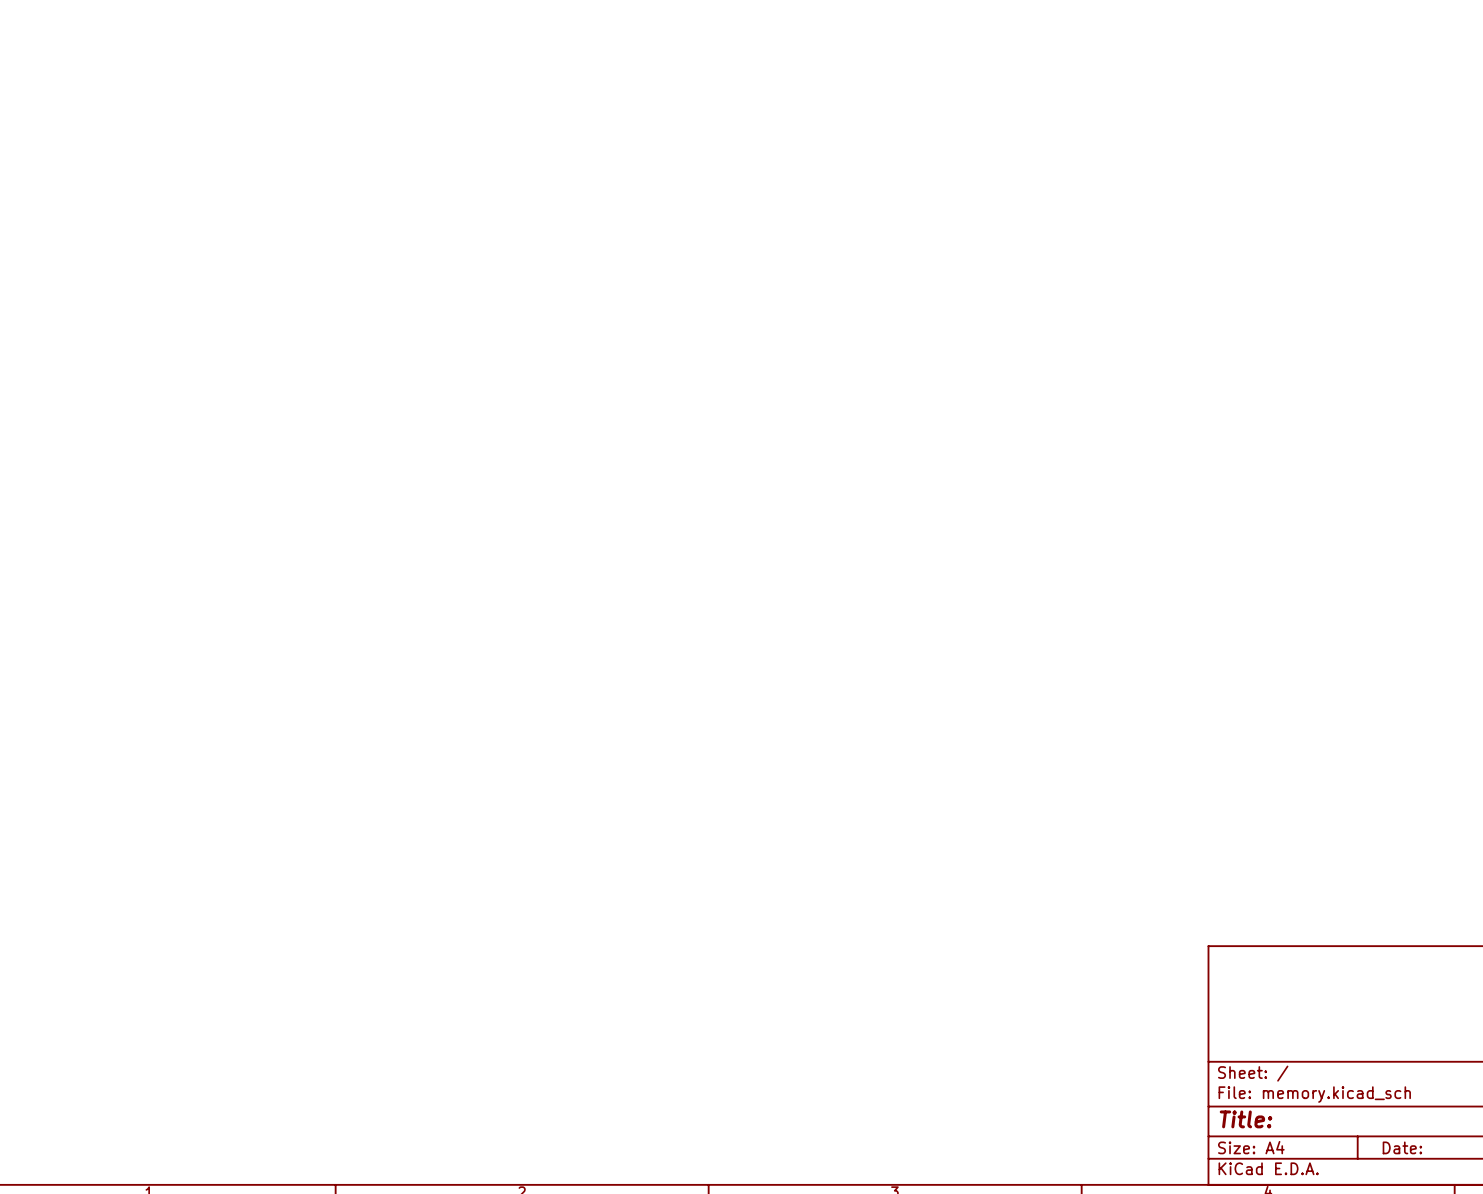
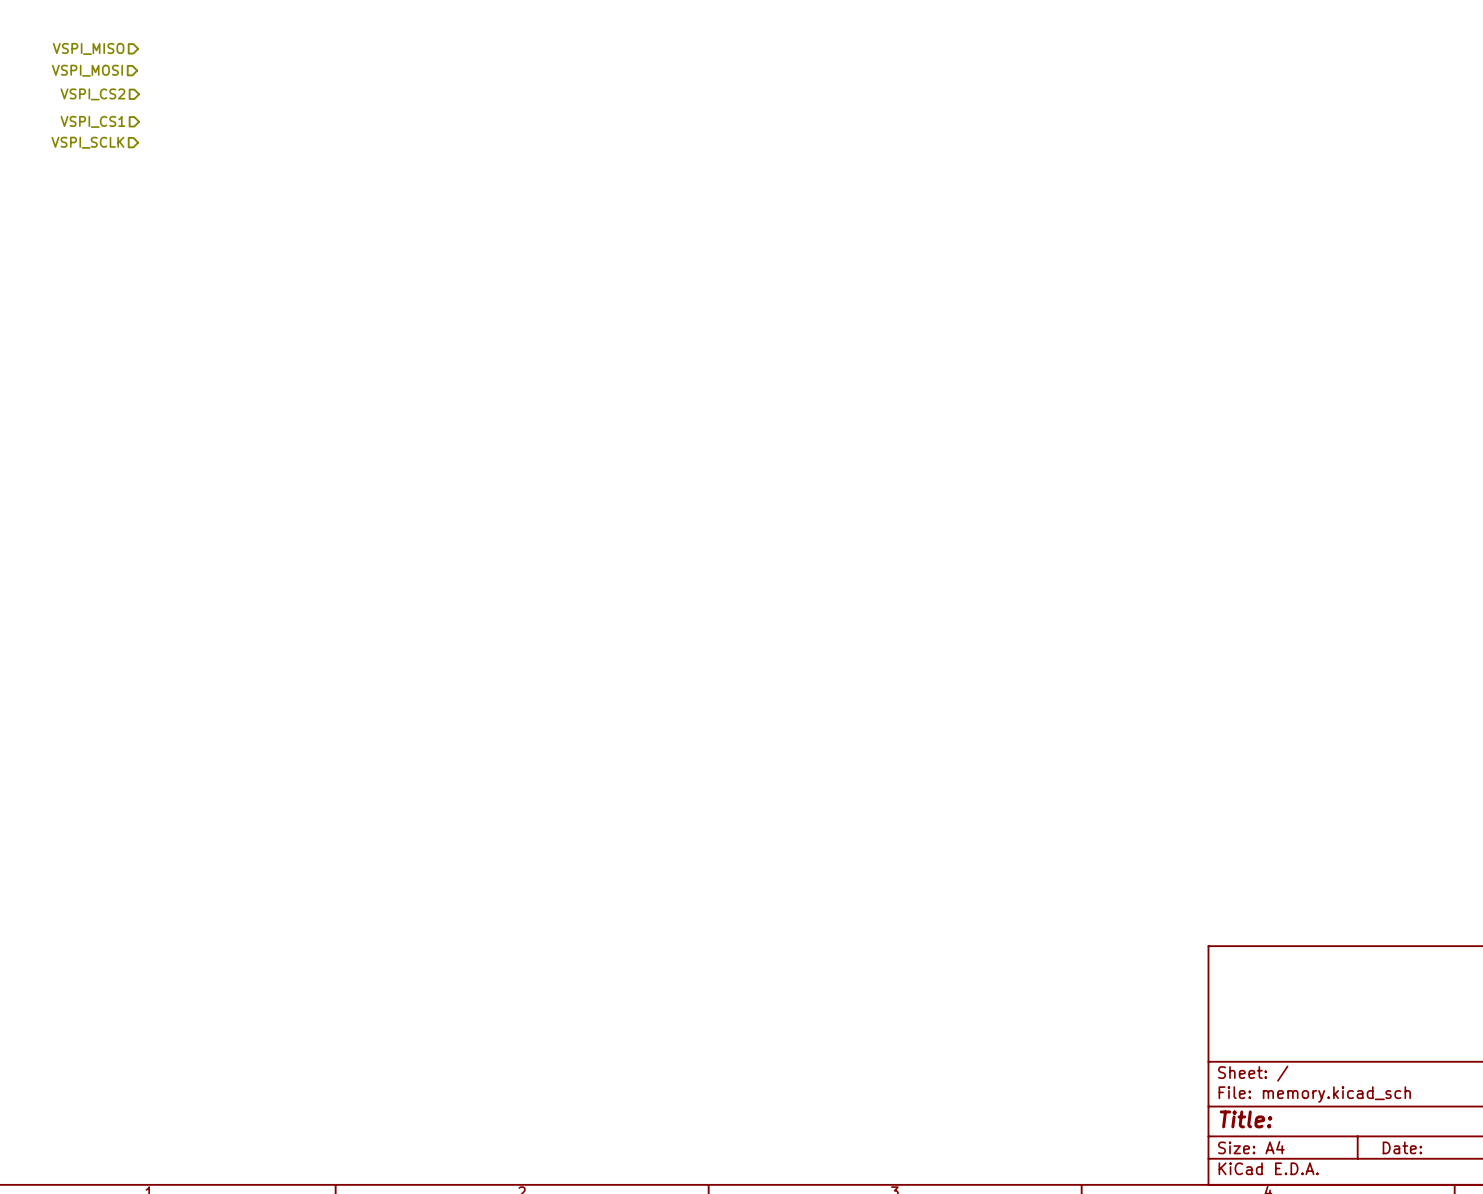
hierarchical label: none -> VSPI_MISO (88, 48)
hierarchical label: none -> VSPI_MOSI (87, 70)
hierarchical label: none -> VSPI_CS2 (92, 94)
hierarchical label: none -> VSPI_CS1 (92, 121)
hierarchical label: none -> VSPI_SCLK (87, 142)

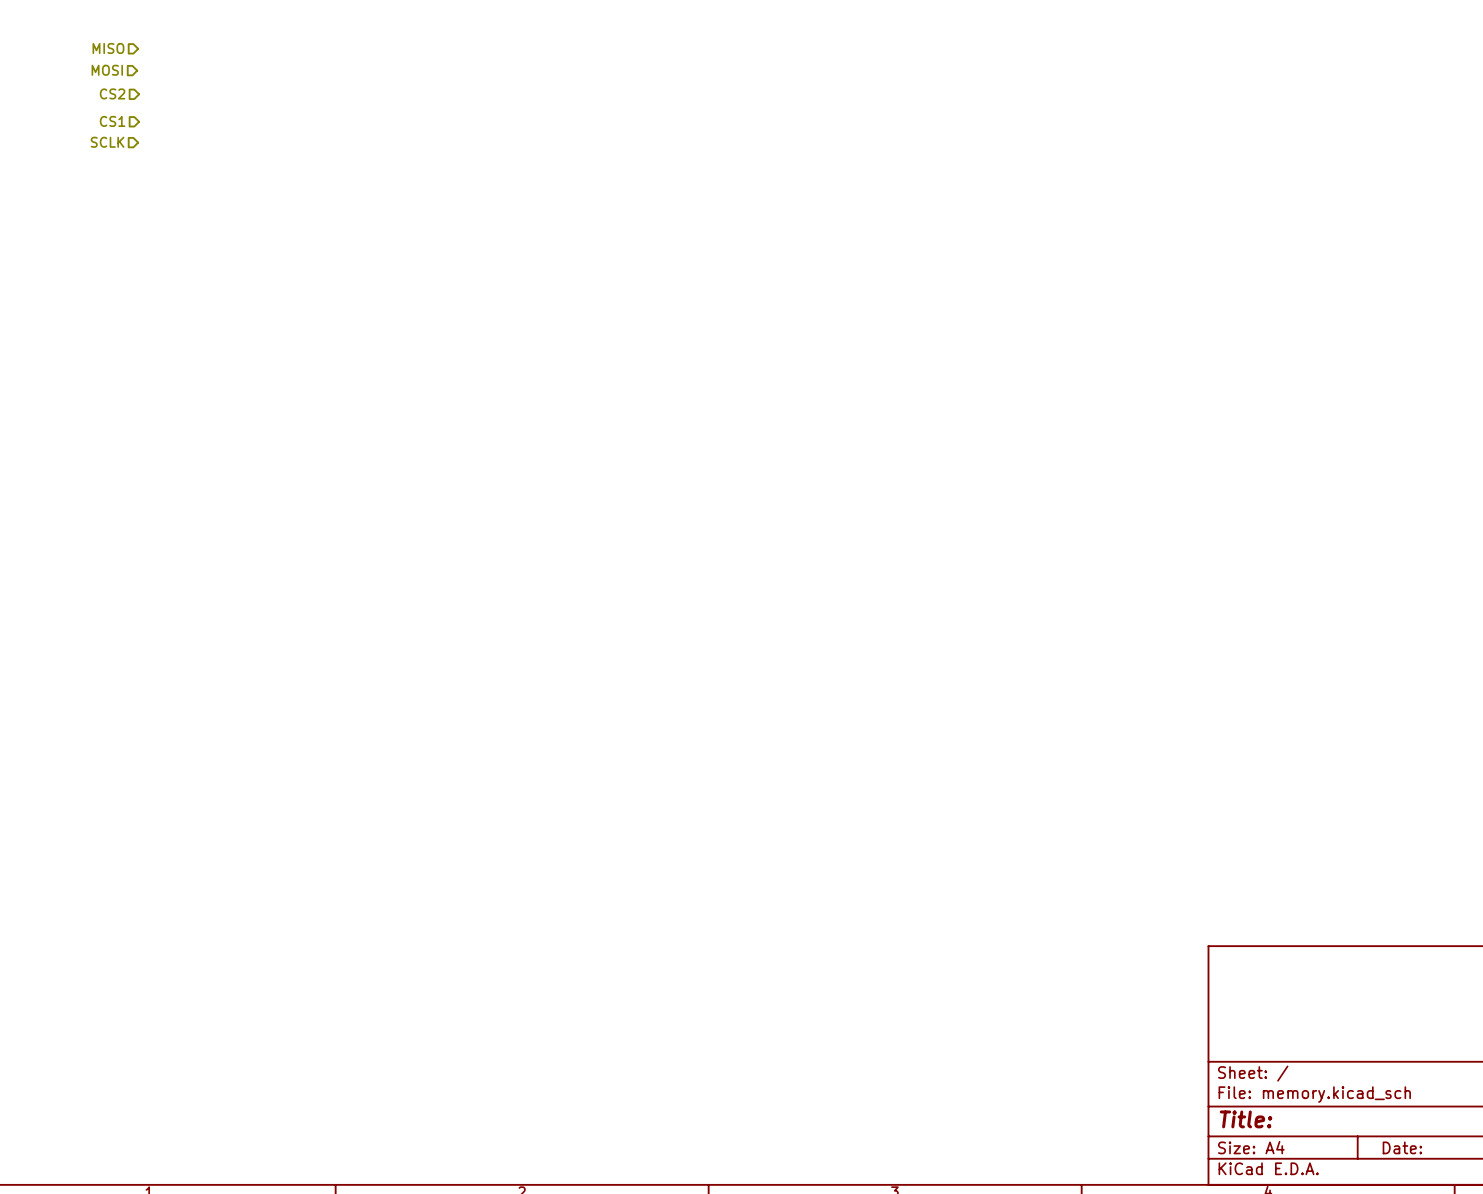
hierarchical label: VSPI_MISO (88, 48) -> MISO (108, 48)
hierarchical label: VSPI_MOSI (87, 70) -> MOSI (107, 70)
hierarchical label: VSPI_CS2 (92, 94) -> CS2 (112, 93)
hierarchical label: VSPI_CS1 (92, 121) -> CS1 (112, 121)
hierarchical label: VSPI_SCLK (87, 142) -> SCLK (107, 142)

